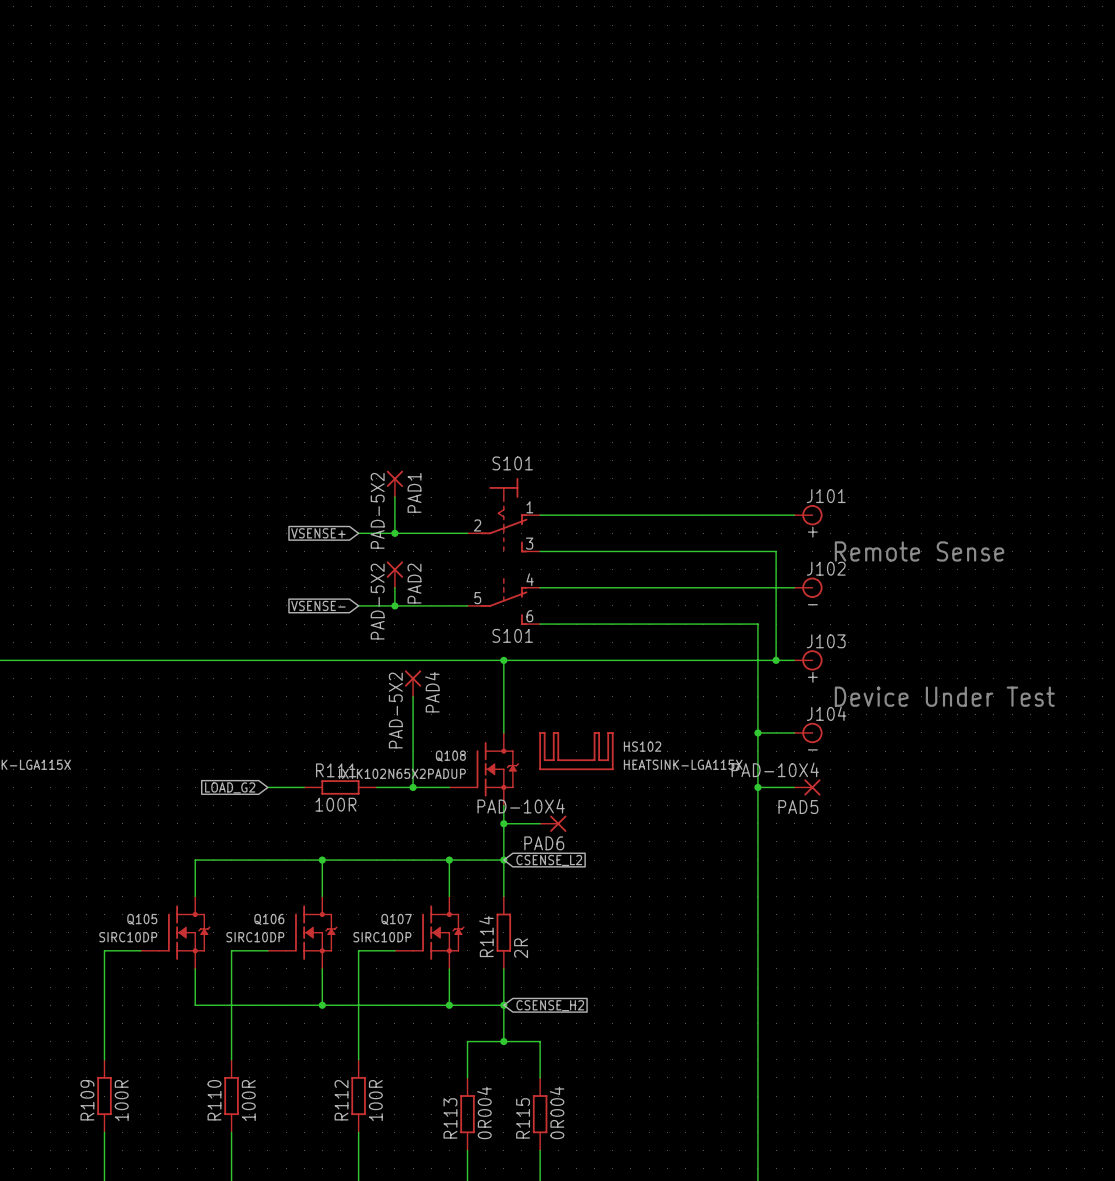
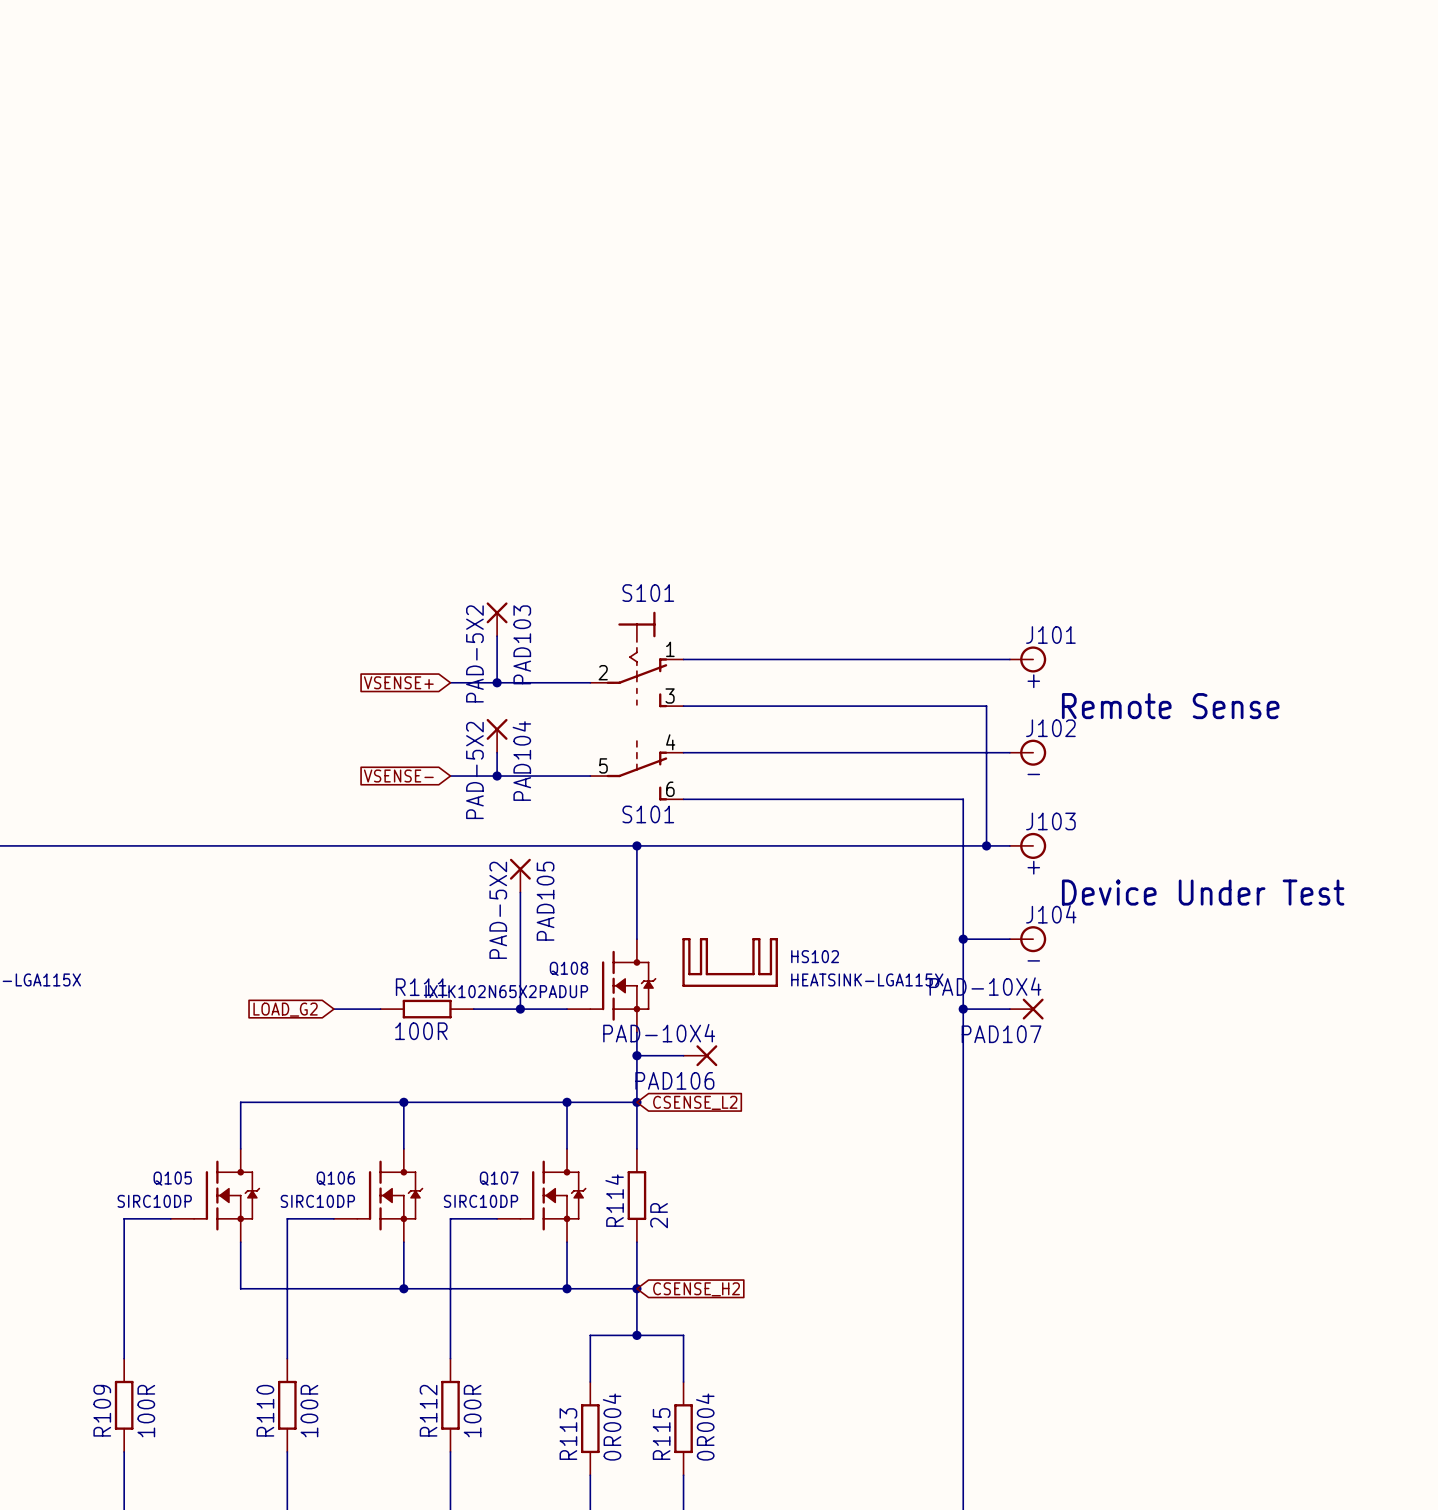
PAD1 name: PAD1 (414, 492) -> PAD103 (522, 644)
PAD2 name: PAD2 (414, 583) -> PAD104 (521, 761)
PAD4 name: PAD4 (432, 692) -> PAD105 (545, 901)
PAD5 name: PAD5 (798, 807) -> PAD107 (1001, 1034)
PAD6 name: PAD6 (544, 843) -> PAD106 (674, 1080)

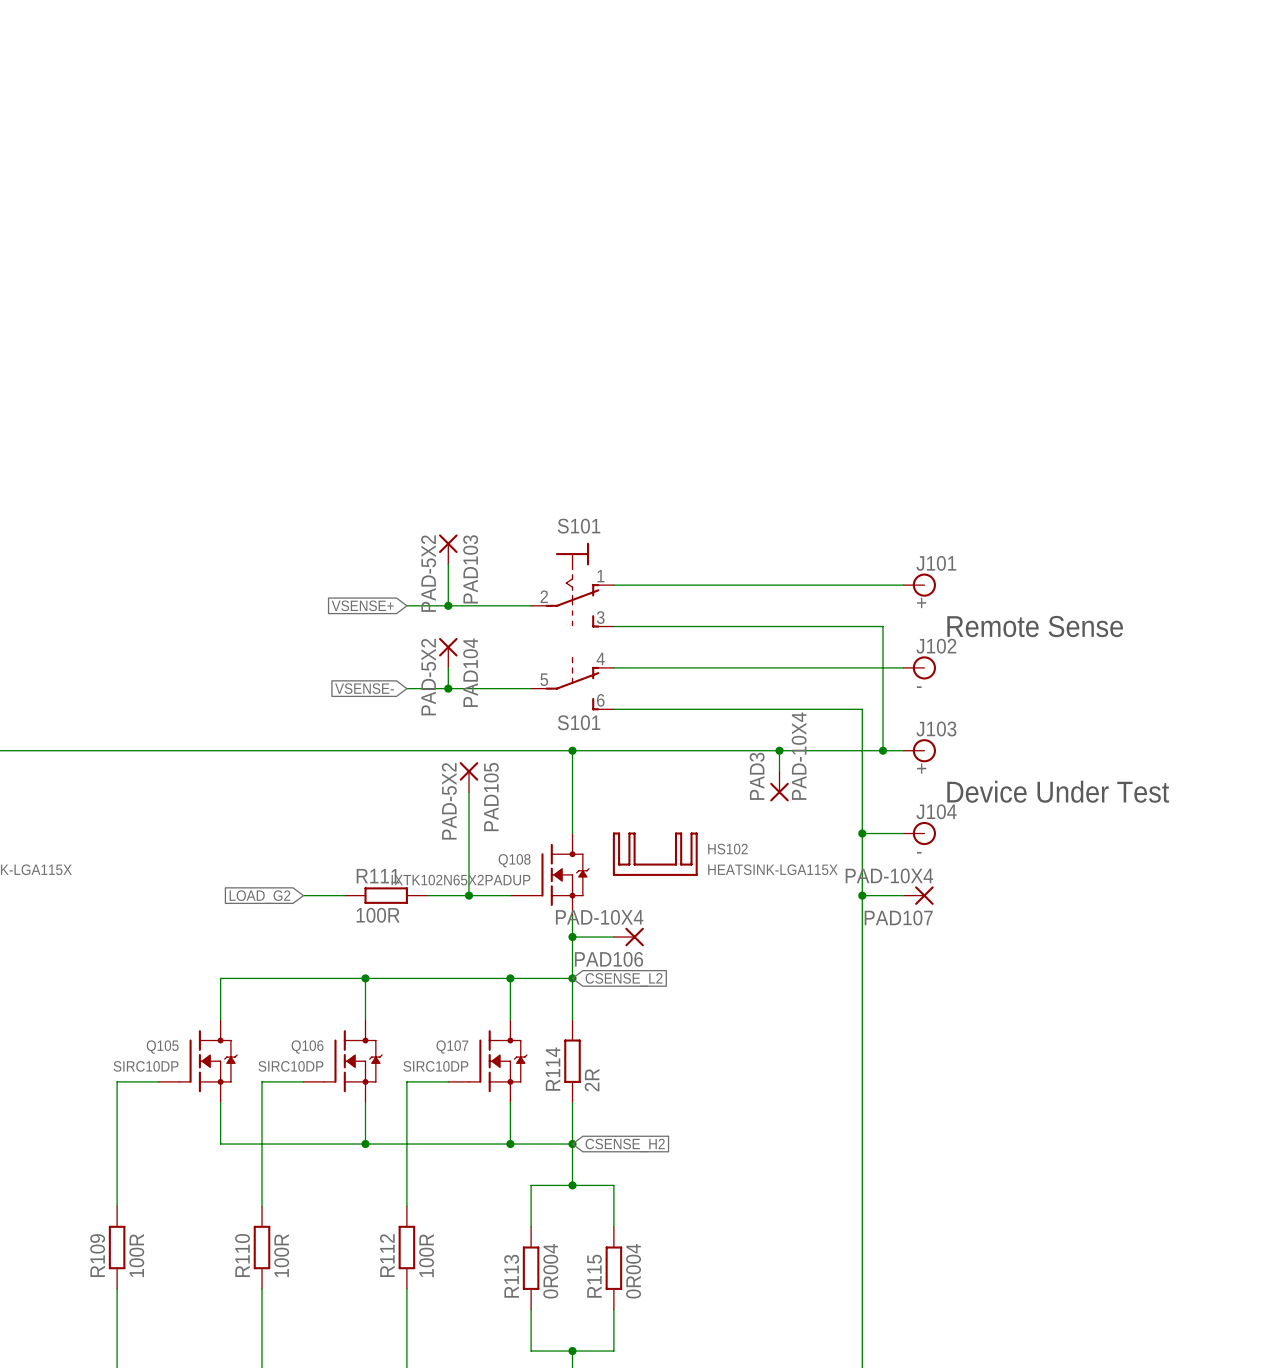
wire: none -> (779, 750) (779, 771)
junction: none -> (779, 750)
PAD3: none -> PAD-10X4 (779, 786)

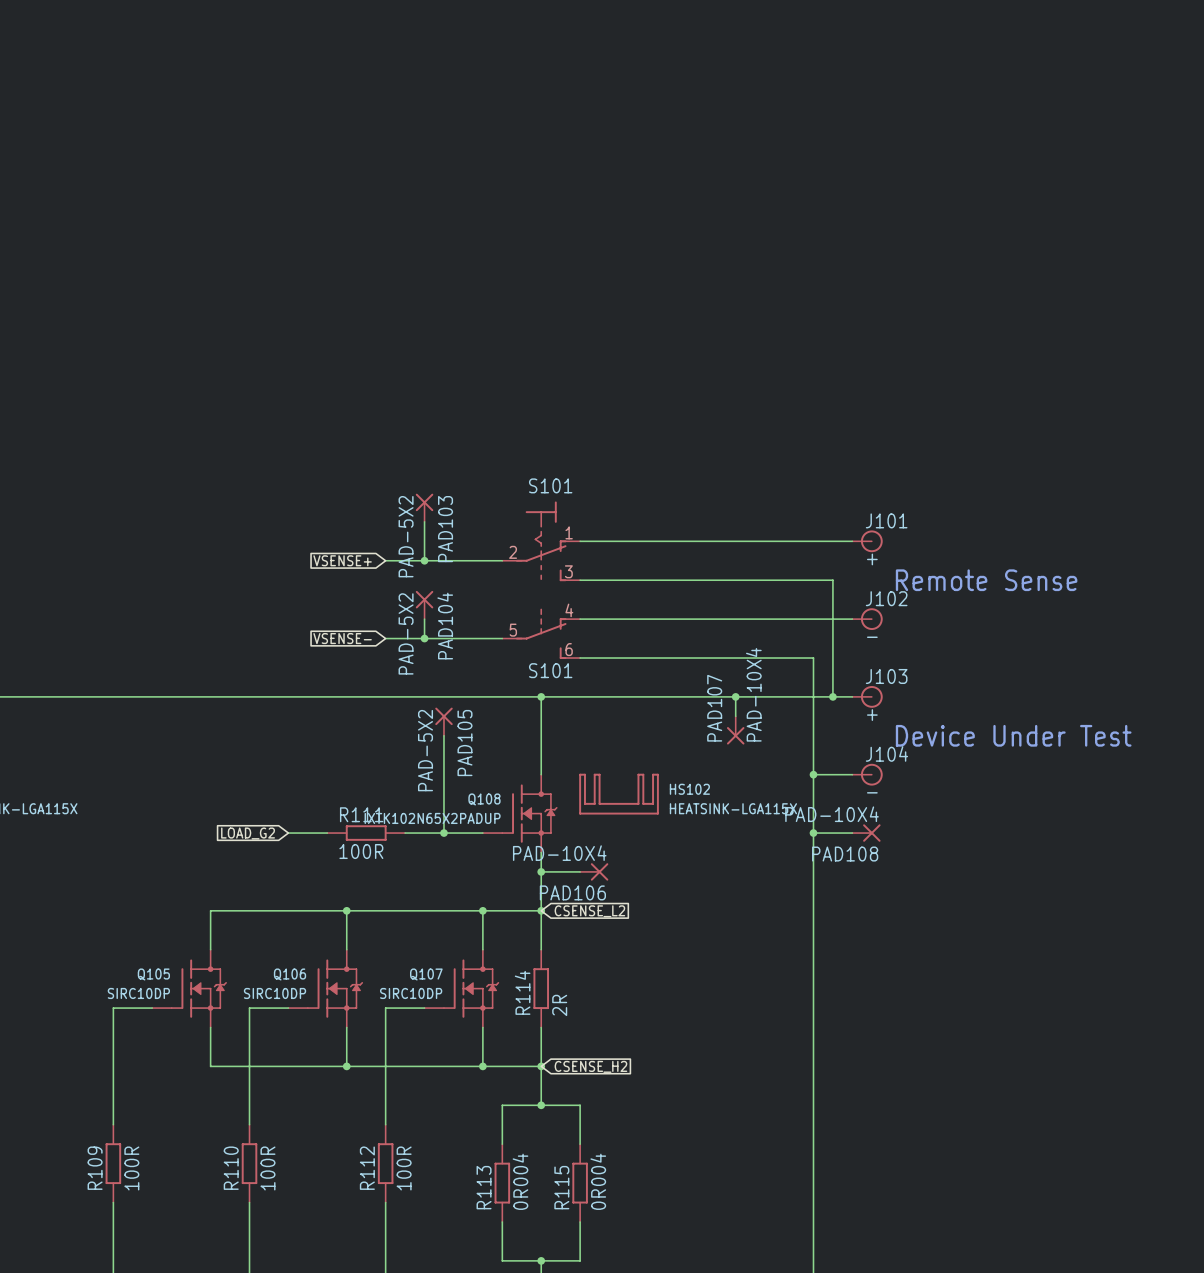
PAD3 name: PAD3 (757, 776) -> PAD107 (714, 708)
PAD107 name: PAD107 (898, 917) -> PAD108 (845, 854)

